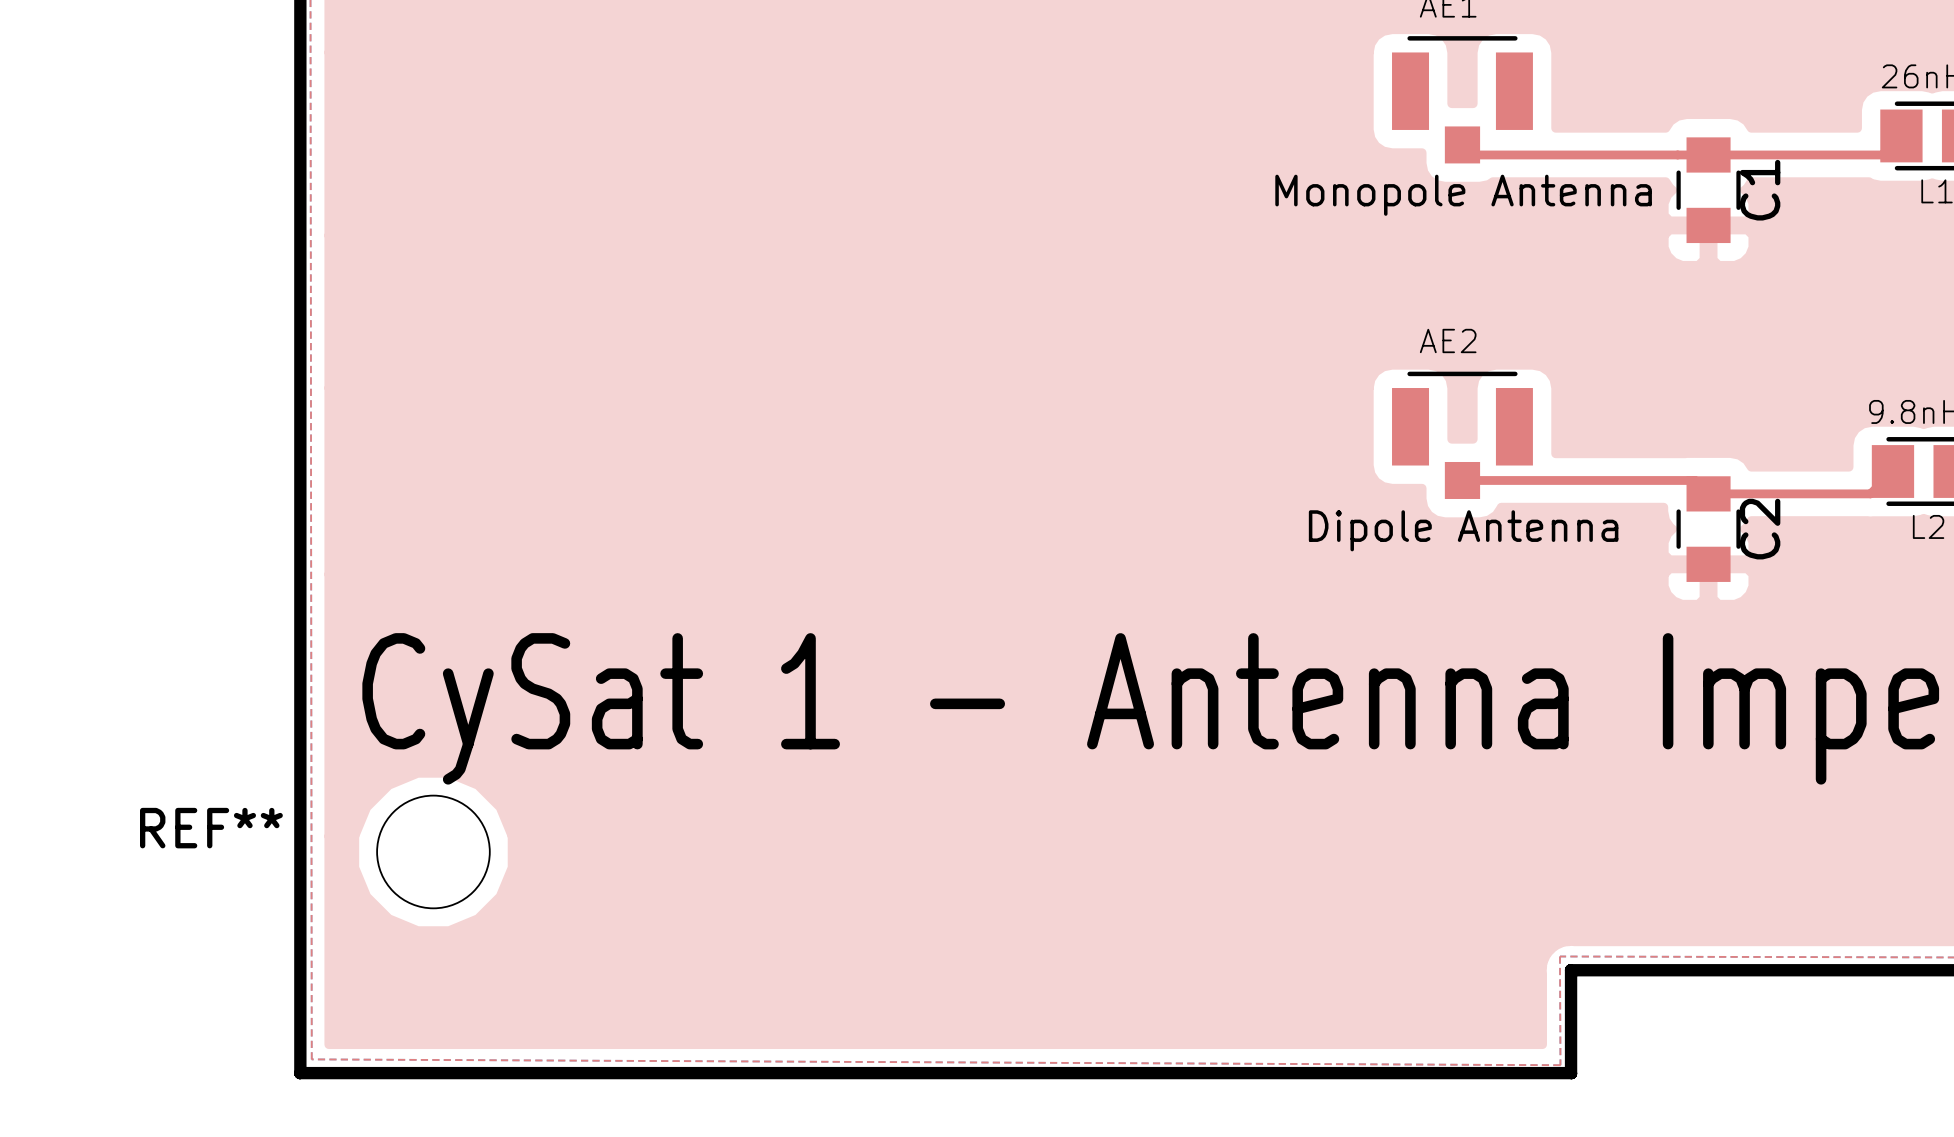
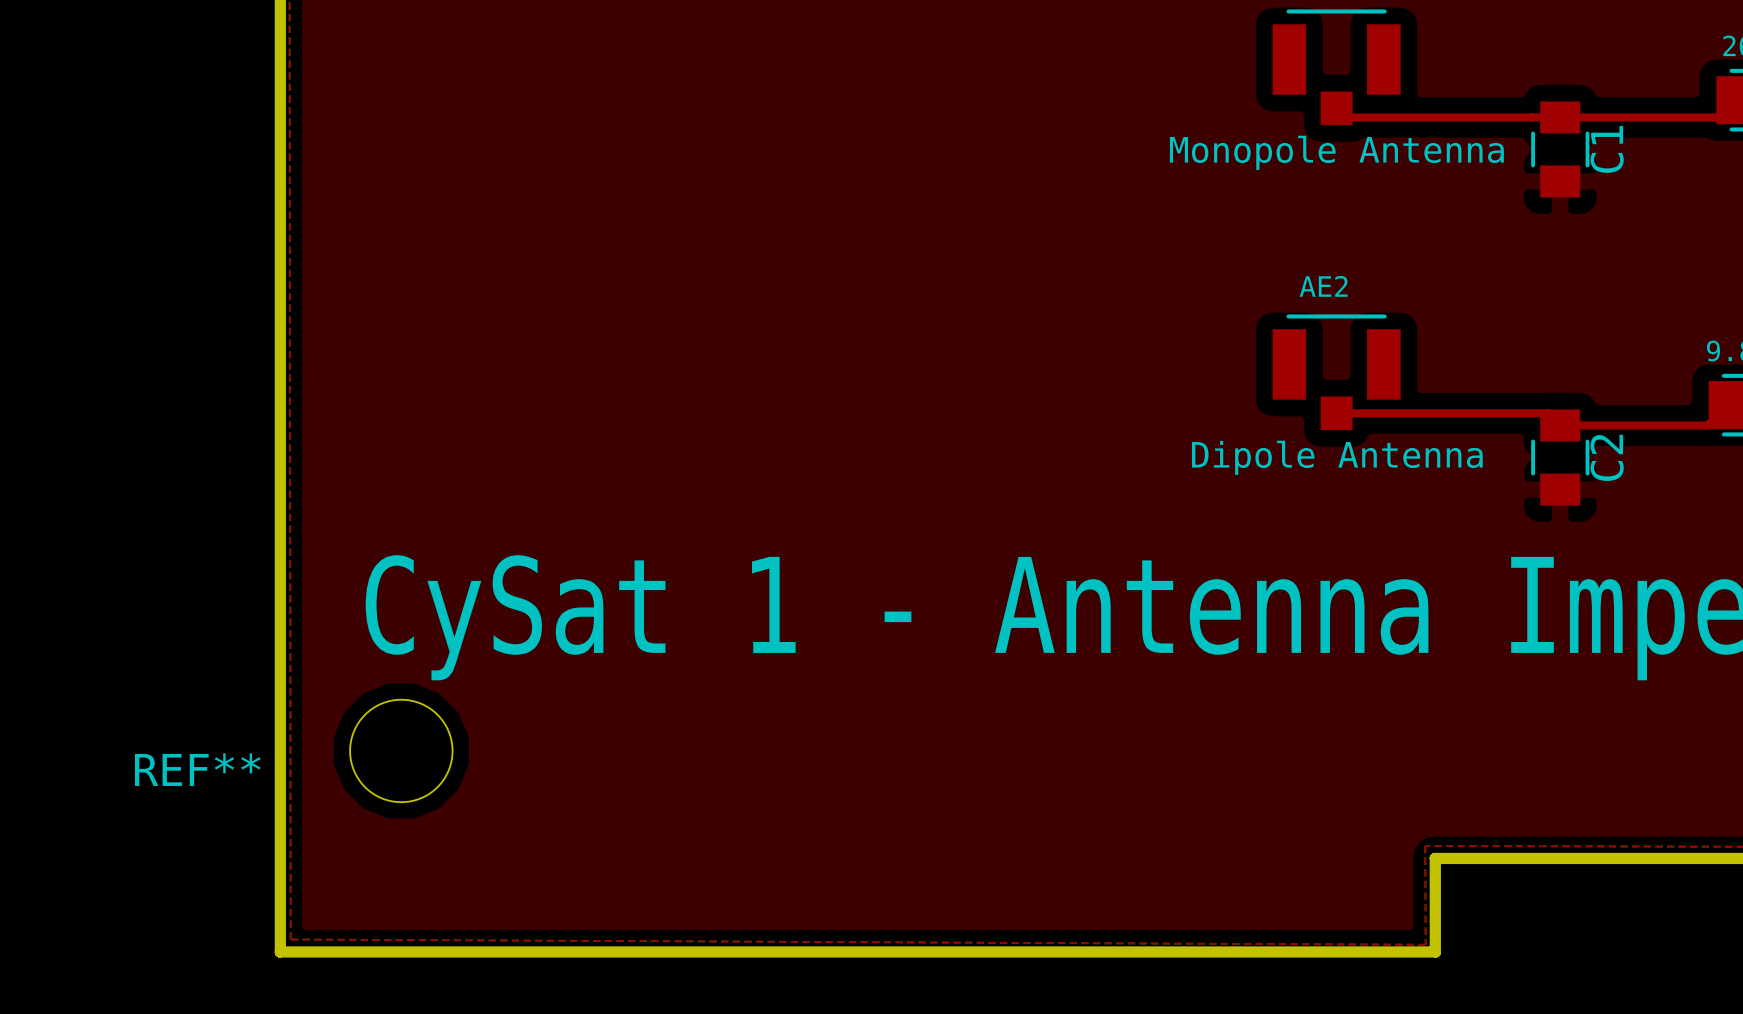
REF** name position: REF** (211, 828) -> REF** (197, 769)

